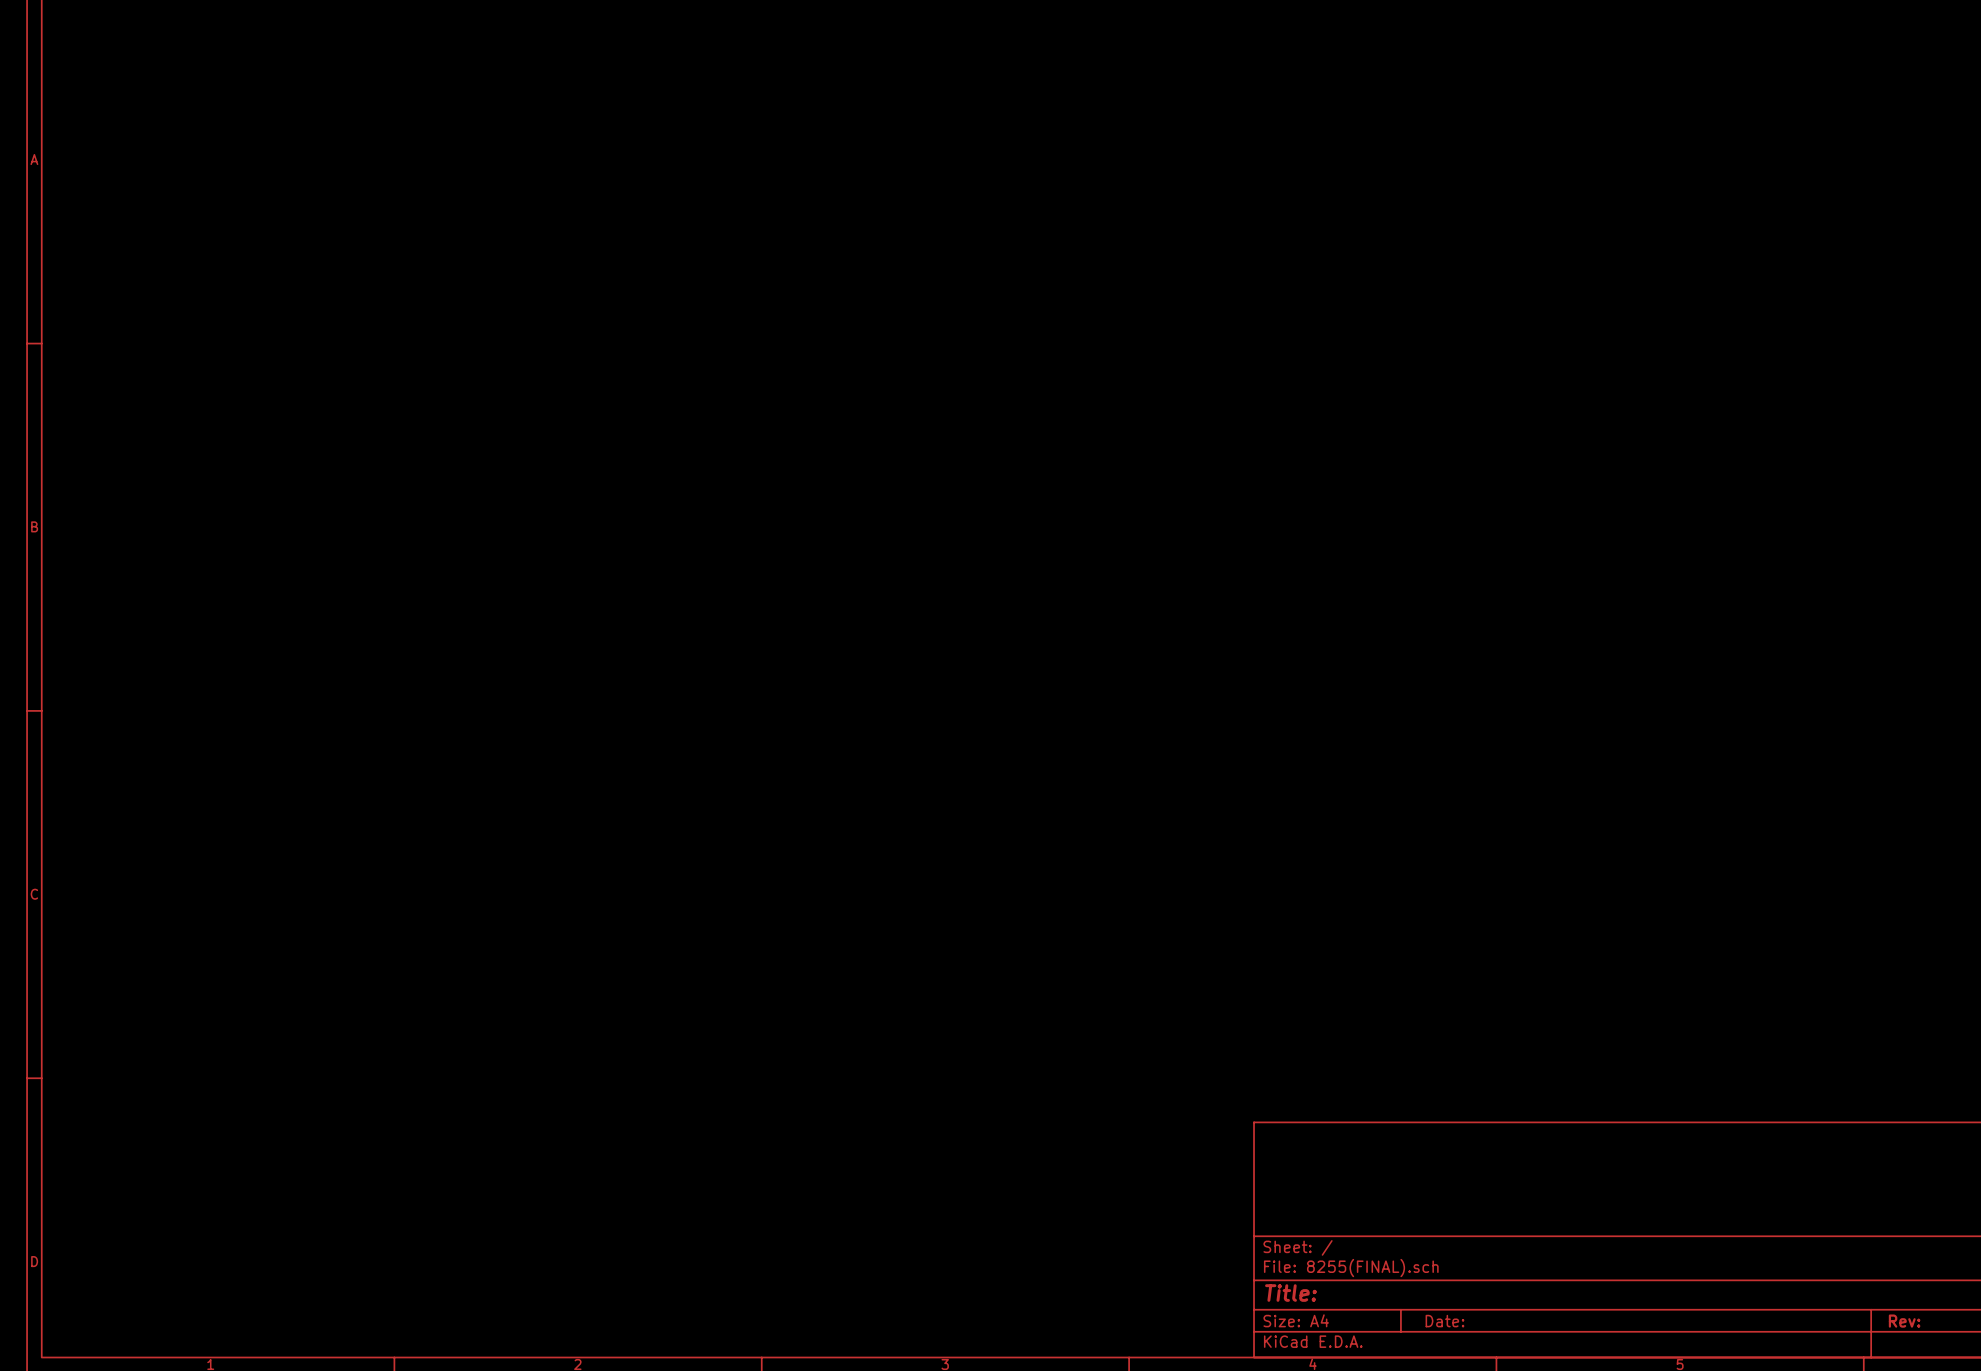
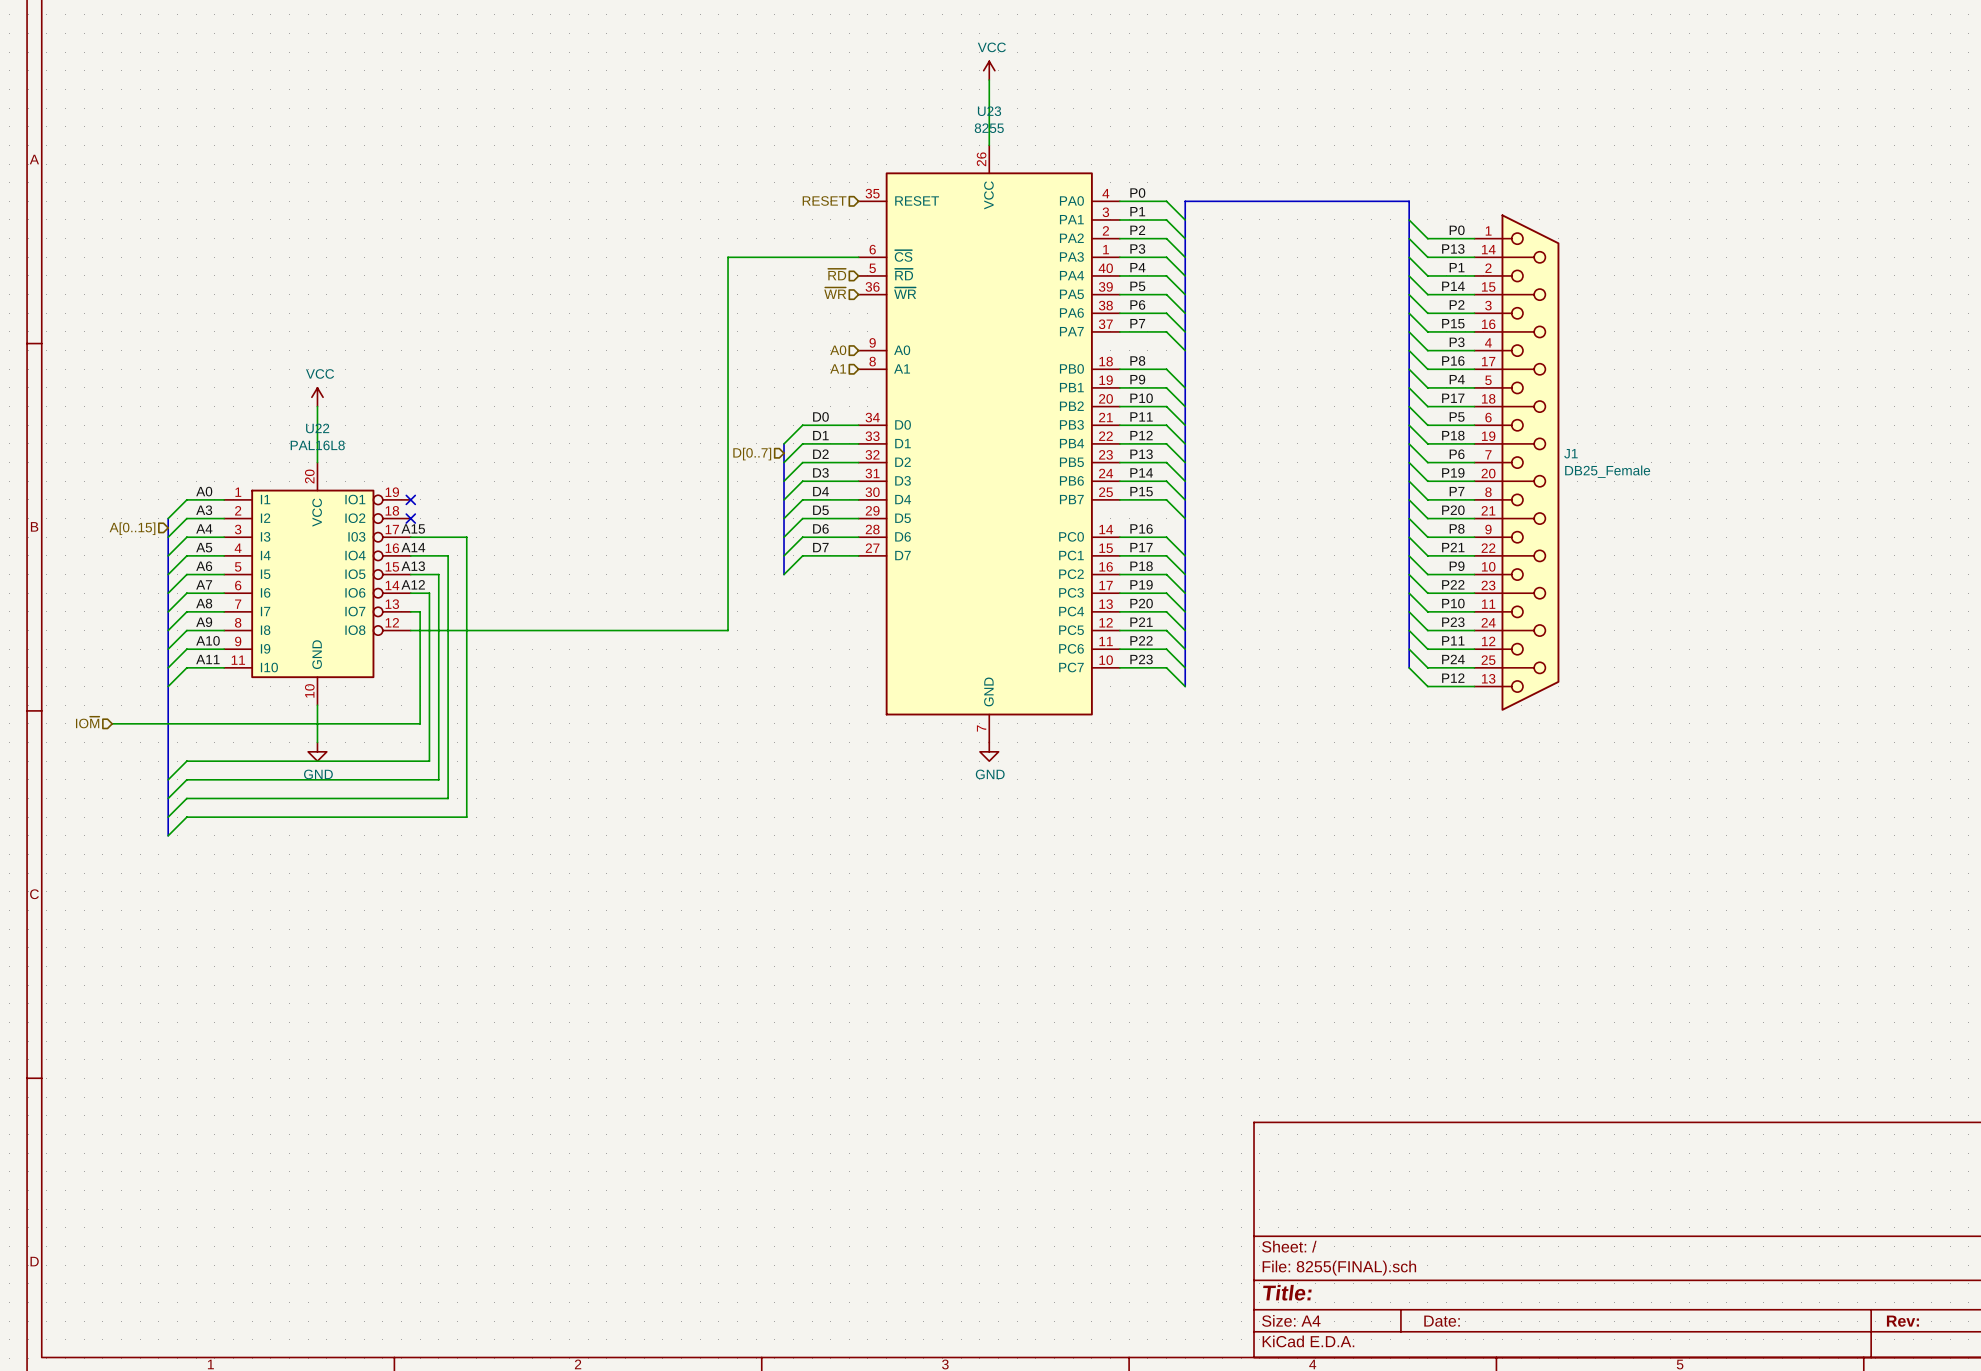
power symbol: none -> VCC (989, 70)
wire: none -> (989, 80) (989, 145)
label: none -> P0 (1137, 193)
hierarchical label: none -> RESET (824, 200)
wire: none -> (1119, 201) (1166, 201) (1185, 219)
label: none -> P1 (1137, 211)
wire: none -> (1119, 219) (1166, 219) (1185, 238)
wire: none -> (1409, 219) (1427, 238) (1474, 238)
label: none -> P2 (1137, 230)
label: none -> P0 (1457, 230)
wire: none -> (1119, 238) (1166, 238) (1185, 257)
wire: none -> (1409, 238) (1427, 257) (1474, 257)
label: none -> P3 (1137, 248)
label: none -> P13 (1453, 248)
wire: none -> (858, 257) (728, 257) (728, 630) (410, 630)
wire: none -> (1119, 257) (1166, 257) (1185, 275)
wire: none -> (1409, 257) (1427, 275) (1474, 275)
label: none -> P4 (1137, 267)
label: none -> P1 (1457, 267)
hierarchical label: none -> ~{RD} (837, 274)
wire: none -> (1119, 275) (1166, 275) (1185, 294)
wire: none -> (1409, 275) (1427, 294) (1474, 294)
label: none -> P5 (1137, 286)
label: none -> P14 (1453, 286)
hierarchical label: none -> ~{WR} (835, 293)
wire: none -> (1119, 294) (1166, 294) (1185, 313)
wire: none -> (1409, 294) (1427, 313) (1474, 313)
label: none -> P6 (1137, 304)
label: none -> P2 (1457, 304)
wire: none -> (1119, 313) (1166, 313) (1185, 331)
wire: none -> (1409, 313) (1427, 331) (1474, 331)
label: none -> P7 (1137, 323)
label: none -> P15 (1453, 323)
wire: none -> (1119, 331) (1166, 331) (1185, 350)
wire: none -> (1409, 331) (1427, 350) (1474, 350)
label: none -> P3 (1457, 342)
hierarchical label: none -> A0 (838, 350)
wire: none -> (1409, 350) (1427, 369) (1474, 369)
label: none -> P8 (1137, 360)
label: none -> P16 (1453, 360)
hierarchical label: none -> A1 (838, 368)
wire: none -> (1119, 369) (1166, 369) (1185, 387)
wire: none -> (1409, 369) (1427, 387) (1474, 387)
label: none -> P9 (1137, 379)
label: none -> P4 (1457, 379)
wire: none -> (1119, 387) (1166, 387) (1185, 406)
wire: none -> (1409, 387) (1427, 406) (1474, 406)
power symbol: none -> VCC (317, 397)
label: none -> P10 (1141, 398)
label: none -> P17 (1453, 398)
wire: none -> (317, 406) (317, 462)
wire: none -> (1119, 406) (1166, 406) (1185, 425)
wire: none -> (1409, 406) (1427, 425) (1474, 425)
label: none -> D0 (820, 416)
label: none -> P11 (1141, 416)
label: none -> P5 (1457, 417)
wire: none -> (858, 425) (802, 425) (784, 443)
wire: none -> (1119, 425) (1166, 425) (1185, 443)
wire: none -> (1409, 425) (1427, 443) (1474, 443)
label: none -> D1 (820, 435)
label: none -> P12 (1141, 435)
label: none -> P18 (1453, 435)
bus: none -> (784, 443) (784, 574)
wire: none -> (858, 443) (802, 443) (784, 462)
U23: none -> 8255 (989, 443)
wire: none -> (1119, 443) (1166, 443) (1185, 462)
wire: none -> (1409, 443) (1427, 462) (1474, 462)
hierarchical label: none -> D[0..7] (752, 454)
label: none -> D2 (820, 454)
label: none -> P13 (1141, 454)
label: none -> P6 (1457, 454)
wire: none -> (858, 462) (802, 462) (784, 481)
wire: none -> (1119, 462) (1166, 462) (1185, 481)
wire: none -> (1409, 462) (1427, 481) (1474, 481)
J1: none -> DB25_Female (1516, 462)
label: none -> D3 (820, 472)
label: none -> P14 (1141, 472)
label: none -> P19 (1453, 472)
wire: none -> (858, 481) (802, 481) (784, 499)
wire: none -> (1119, 481) (1166, 481) (1185, 499)
wire: none -> (1409, 481) (1427, 499) (1474, 499)
label: none -> A0 (204, 491)
label: none -> D4 (821, 491)
label: none -> P15 (1141, 491)
label: none -> P7 (1457, 491)
wire: none -> (224, 499) (186, 499) (168, 518)
no-connect mark: none -> (410, 499)
wire: none -> (858, 499) (802, 499) (784, 518)
wire: none -> (1119, 499) (1166, 499) (1185, 518)
wire: none -> (1409, 499) (1427, 518) (1474, 518)
label: none -> A3 (204, 510)
label: none -> D5 (820, 510)
label: none -> P20 (1453, 510)
bus: none -> (168, 518) (168, 835)
wire: none -> (224, 518) (186, 518) (168, 537)
no-connect mark: none -> (410, 518)
wire: none -> (858, 518) (802, 518) (784, 537)
wire: none -> (1409, 518) (1427, 537) (1474, 537)
hierarchical label: none -> A[0..15] (132, 528)
label: none -> A4 (204, 528)
label: none -> A15 (413, 528)
label: none -> D6 (820, 528)
label: none -> P16 (1141, 528)
label: none -> P8 (1457, 528)
wire: none -> (224, 537) (186, 537) (168, 555)
wire: none -> (410, 537) (466, 537) (466, 817) (186, 817) (168, 835)
wire: none -> (858, 537) (802, 537) (784, 555)
wire: none -> (1119, 537) (1166, 537) (1185, 555)
wire: none -> (1409, 537) (1427, 555) (1474, 555)
label: none -> A5 (204, 547)
label: none -> A14 (413, 547)
label: none -> D7 (820, 547)
label: none -> P17 (1141, 547)
label: none -> P21 (1453, 547)
wire: none -> (224, 555) (186, 555) (168, 574)
wire: none -> (410, 555) (448, 555) (448, 798) (186, 798) (168, 817)
wire: none -> (858, 555) (802, 555) (784, 574)
wire: none -> (1119, 555) (1166, 555) (1185, 574)
wire: none -> (1409, 555) (1427, 574) (1474, 574)
label: none -> A6 (204, 566)
label: none -> A13 (413, 566)
label: none -> P18 (1141, 566)
label: none -> P9 (1457, 566)
wire: none -> (224, 574) (186, 574) (168, 593)
wire: none -> (410, 574) (438, 574) (438, 779) (186, 779) (168, 798)
wire: none -> (1119, 574) (1166, 574) (1185, 593)
wire: none -> (1409, 574) (1427, 593) (1474, 593)
U22: none -> PAL16L8 (317, 583)
label: none -> A7 (204, 584)
label: none -> A12 (413, 584)
label: none -> P19 (1141, 584)
label: none -> P22 (1453, 584)
wire: none -> (224, 593) (186, 593) (168, 611)
wire: none -> (410, 593) (429, 593) (429, 761) (186, 761) (168, 779)
wire: none -> (1119, 593) (1166, 593) (1185, 611)
wire: none -> (1409, 593) (1427, 611) (1474, 611)
label: none -> A8 (204, 603)
label: none -> P20 (1141, 603)
label: none -> P10 (1453, 603)
wire: none -> (224, 611) (186, 611) (168, 630)
wire: none -> (410, 611) (420, 611) (420, 723) (112, 723)
wire: none -> (1119, 611) (1166, 611) (1185, 630)
wire: none -> (1409, 611) (1427, 630) (1474, 630)
label: none -> A9 (204, 622)
label: none -> P21 (1141, 622)
label: none -> P23 (1453, 622)
wire: none -> (224, 630) (186, 630) (168, 649)
wire: none -> (1119, 630) (1166, 630) (1185, 649)
wire: none -> (1409, 630) (1427, 649) (1474, 649)
label: none -> A10 (207, 640)
label: none -> P22 (1141, 640)
label: none -> P11 (1453, 640)
wire: none -> (224, 649) (186, 649) (168, 667)
wire: none -> (1119, 649) (1166, 649) (1185, 667)
wire: none -> (1409, 649) (1427, 667) (1474, 667)
label: none -> A11 (207, 659)
label: none -> P23 (1141, 659)
label: none -> P24 (1453, 659)
wire: none -> (224, 667) (186, 667) (168, 686)
wire: none -> (1119, 667) (1166, 667) (1185, 686)
wire: none -> (1409, 667) (1427, 686) (1474, 686)
bus: none -> (1409, 667) (1409, 201) (1185, 201) (1185, 686)
label: none -> P12 (1453, 678)
wire: none -> (317, 705) (317, 742)
hierarchical label: none -> IO~{M} (87, 722)
power symbol: none -> GND (317, 751)
power symbol: none -> GND (989, 751)

